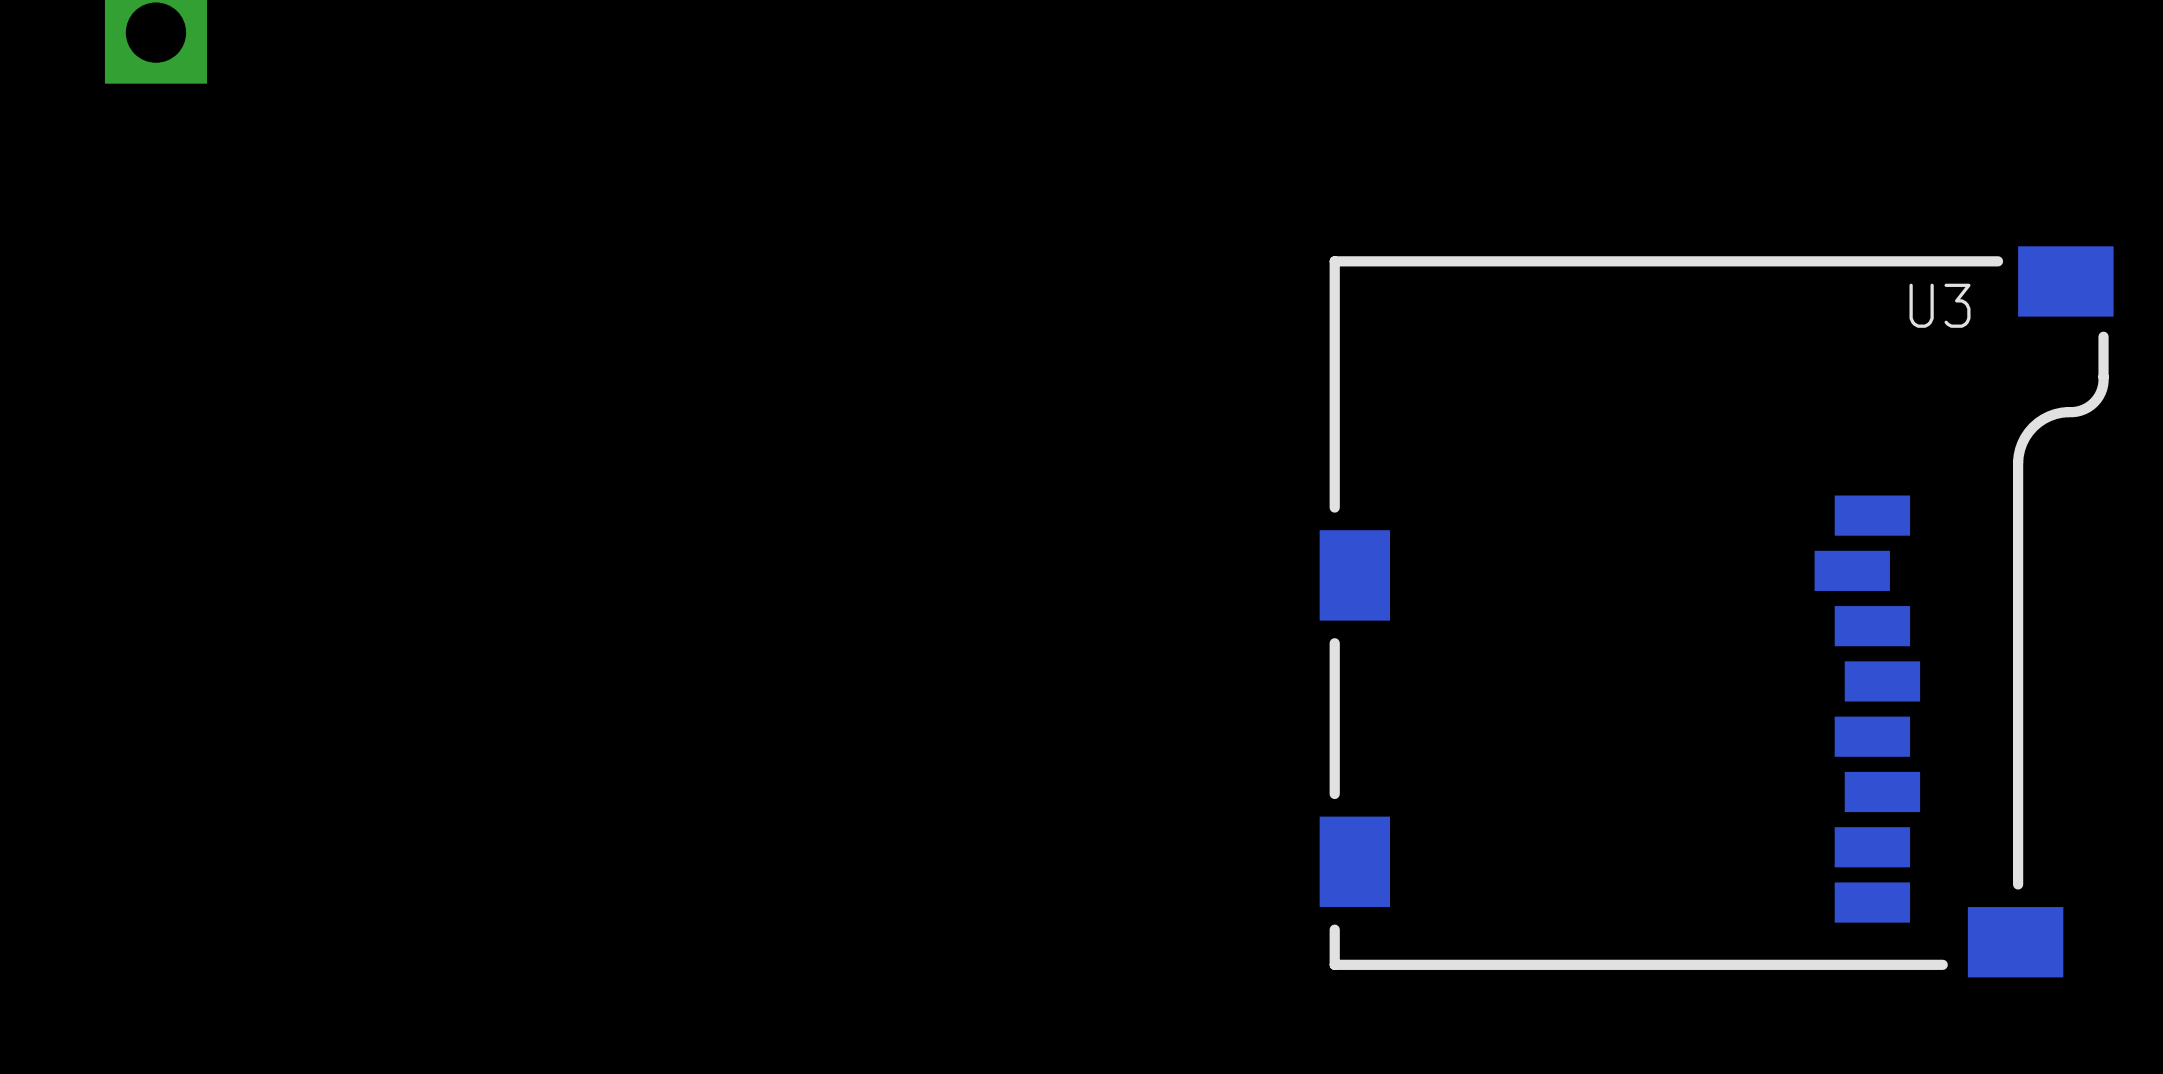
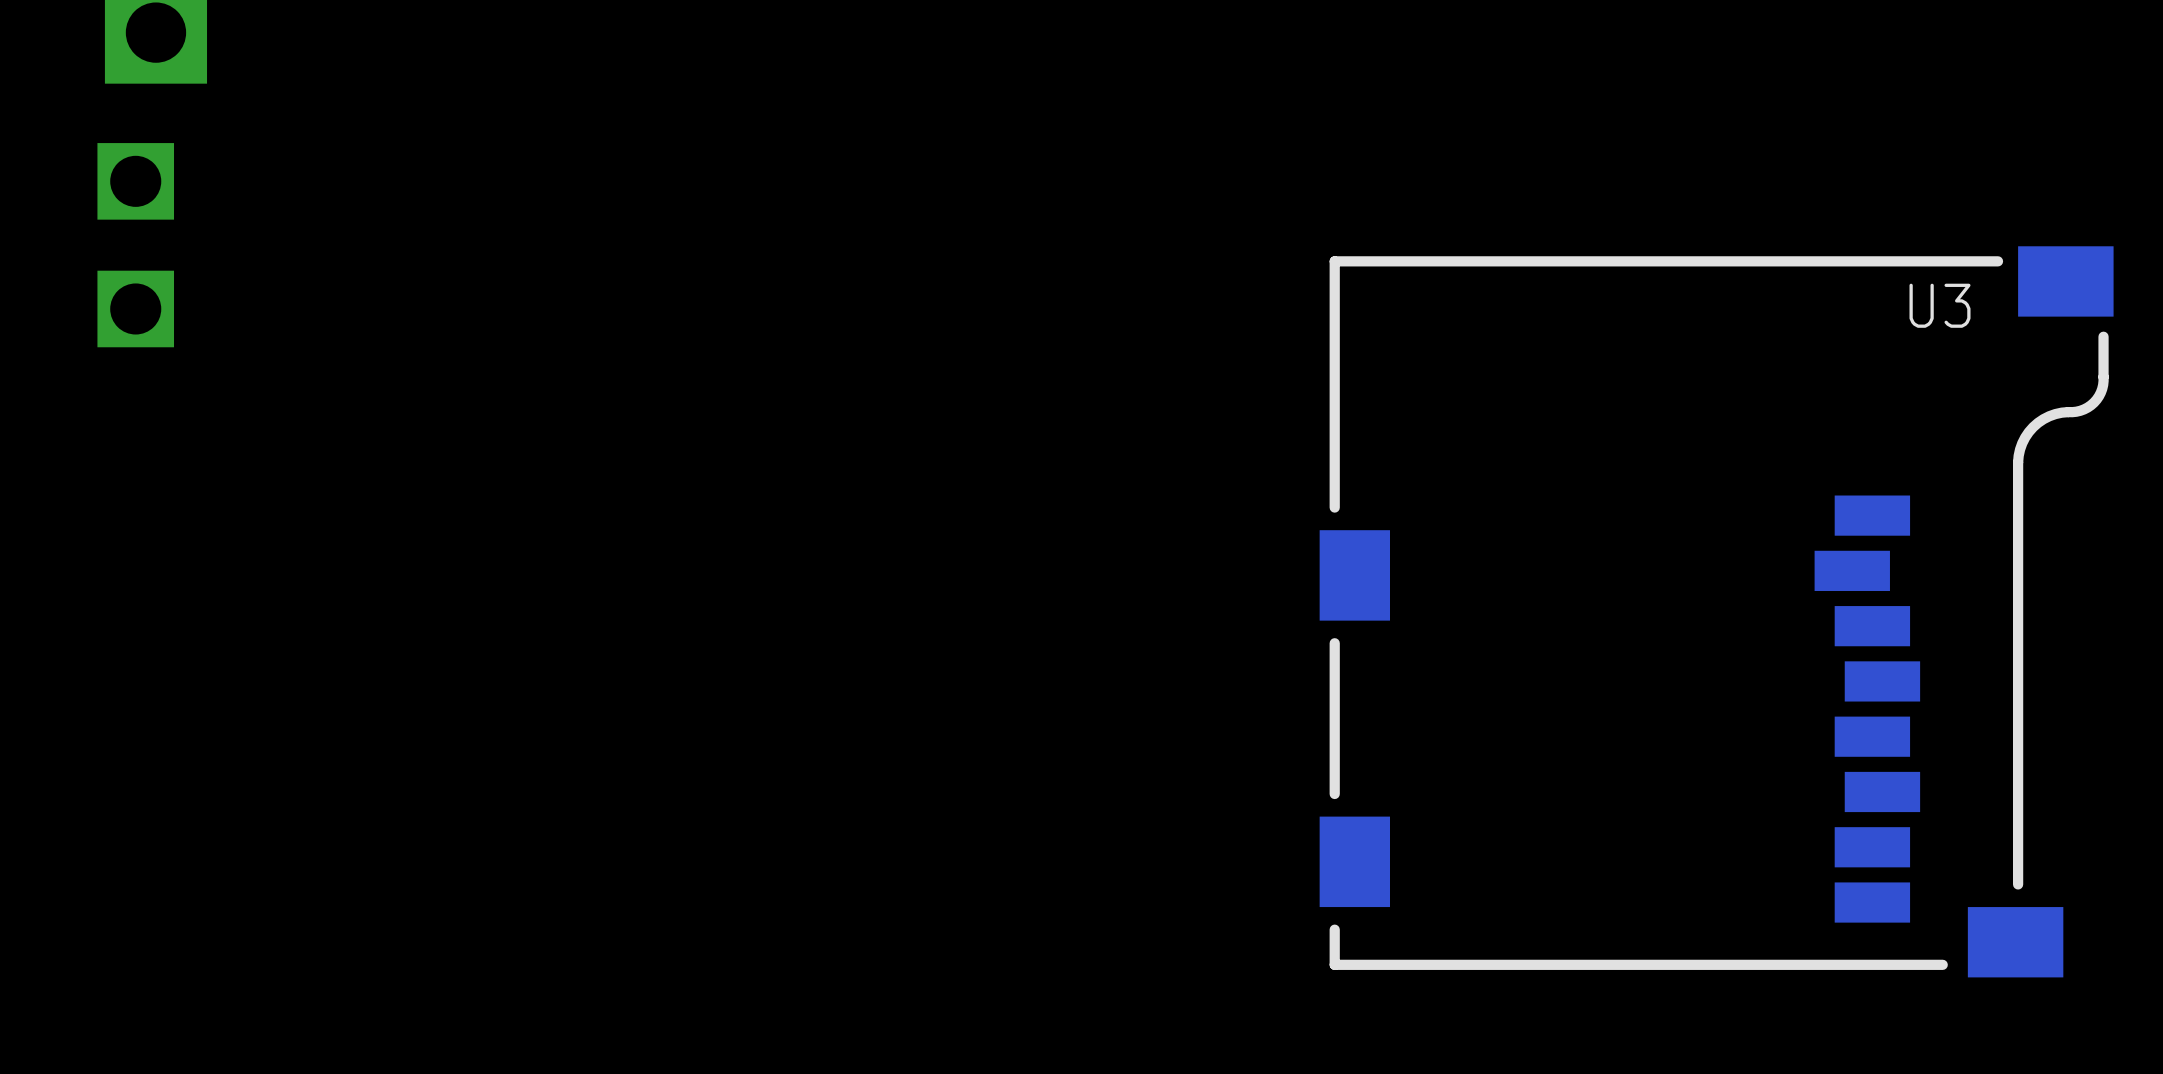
part: none -> (135, 245)

